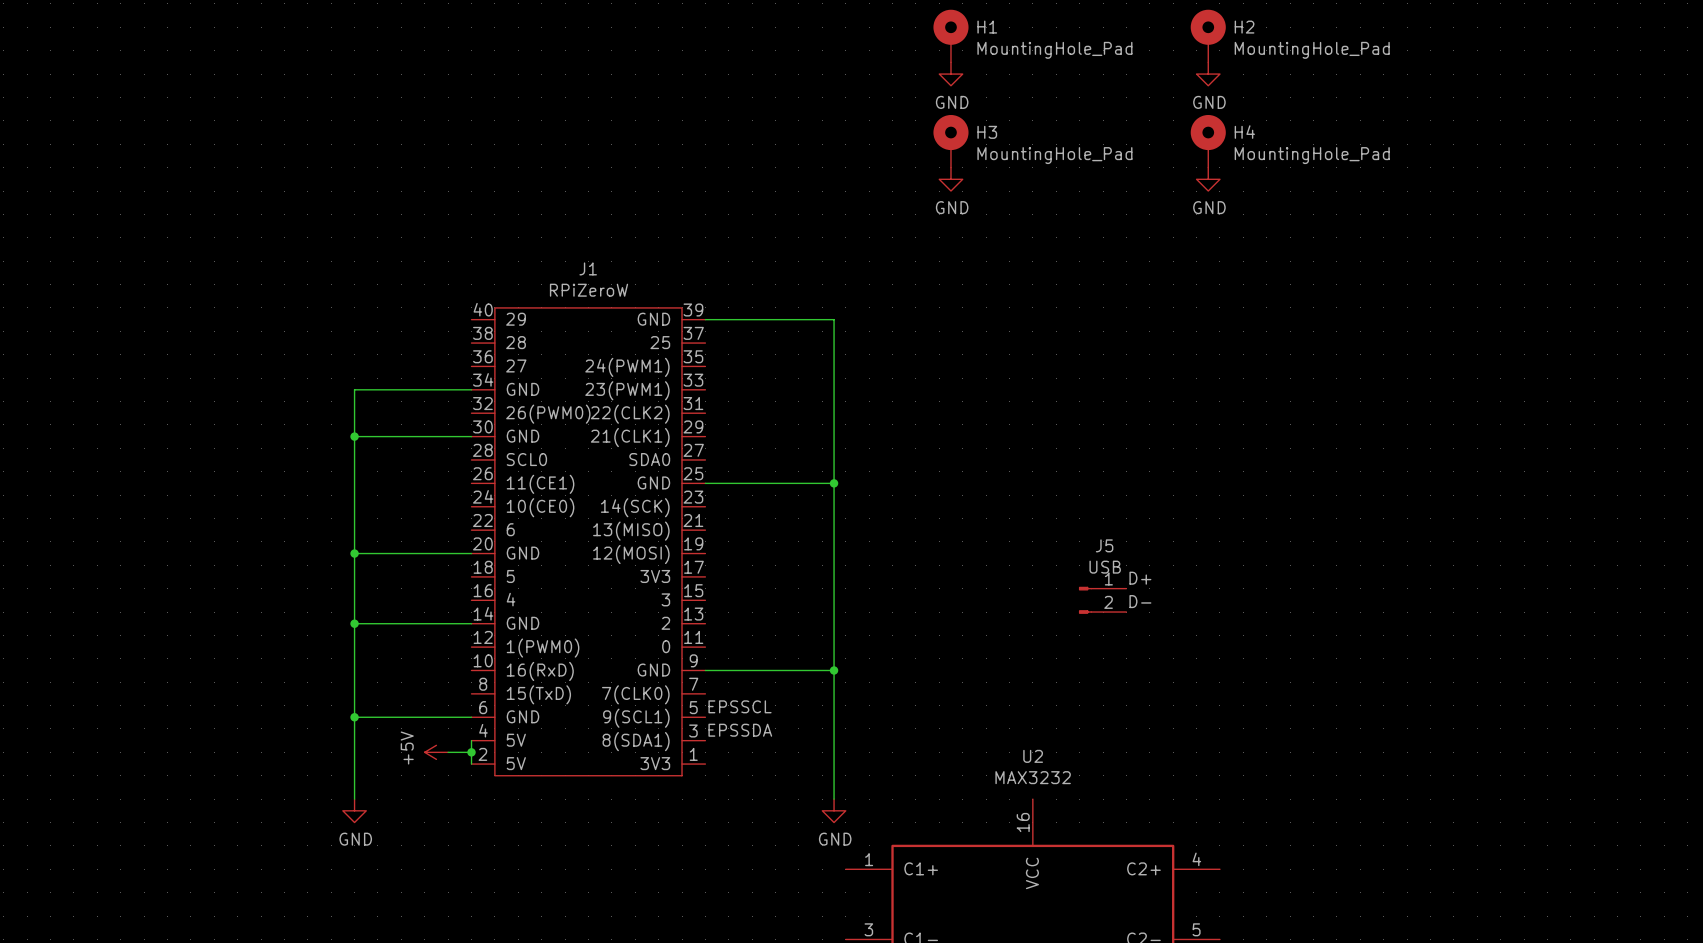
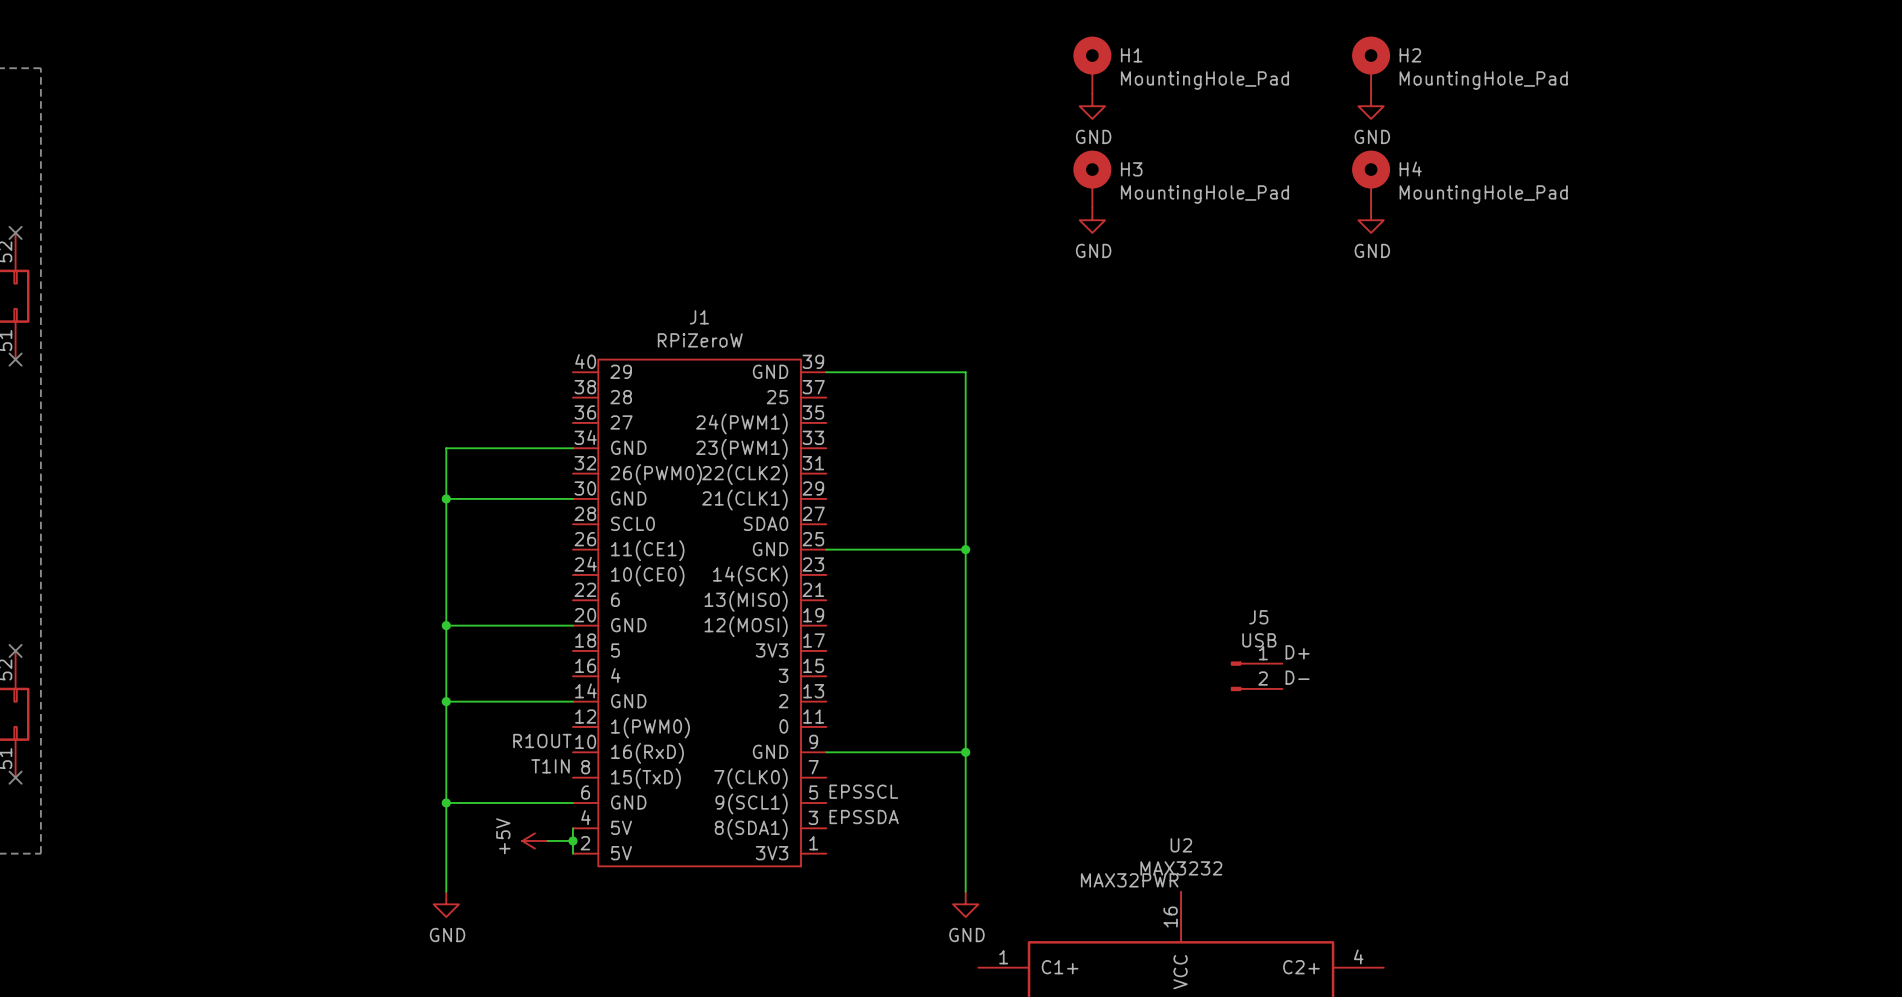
label: none -> R1OUT (542, 741)
label: none -> T1IN (550, 766)
label: none -> MAX32PWR (1129, 880)

